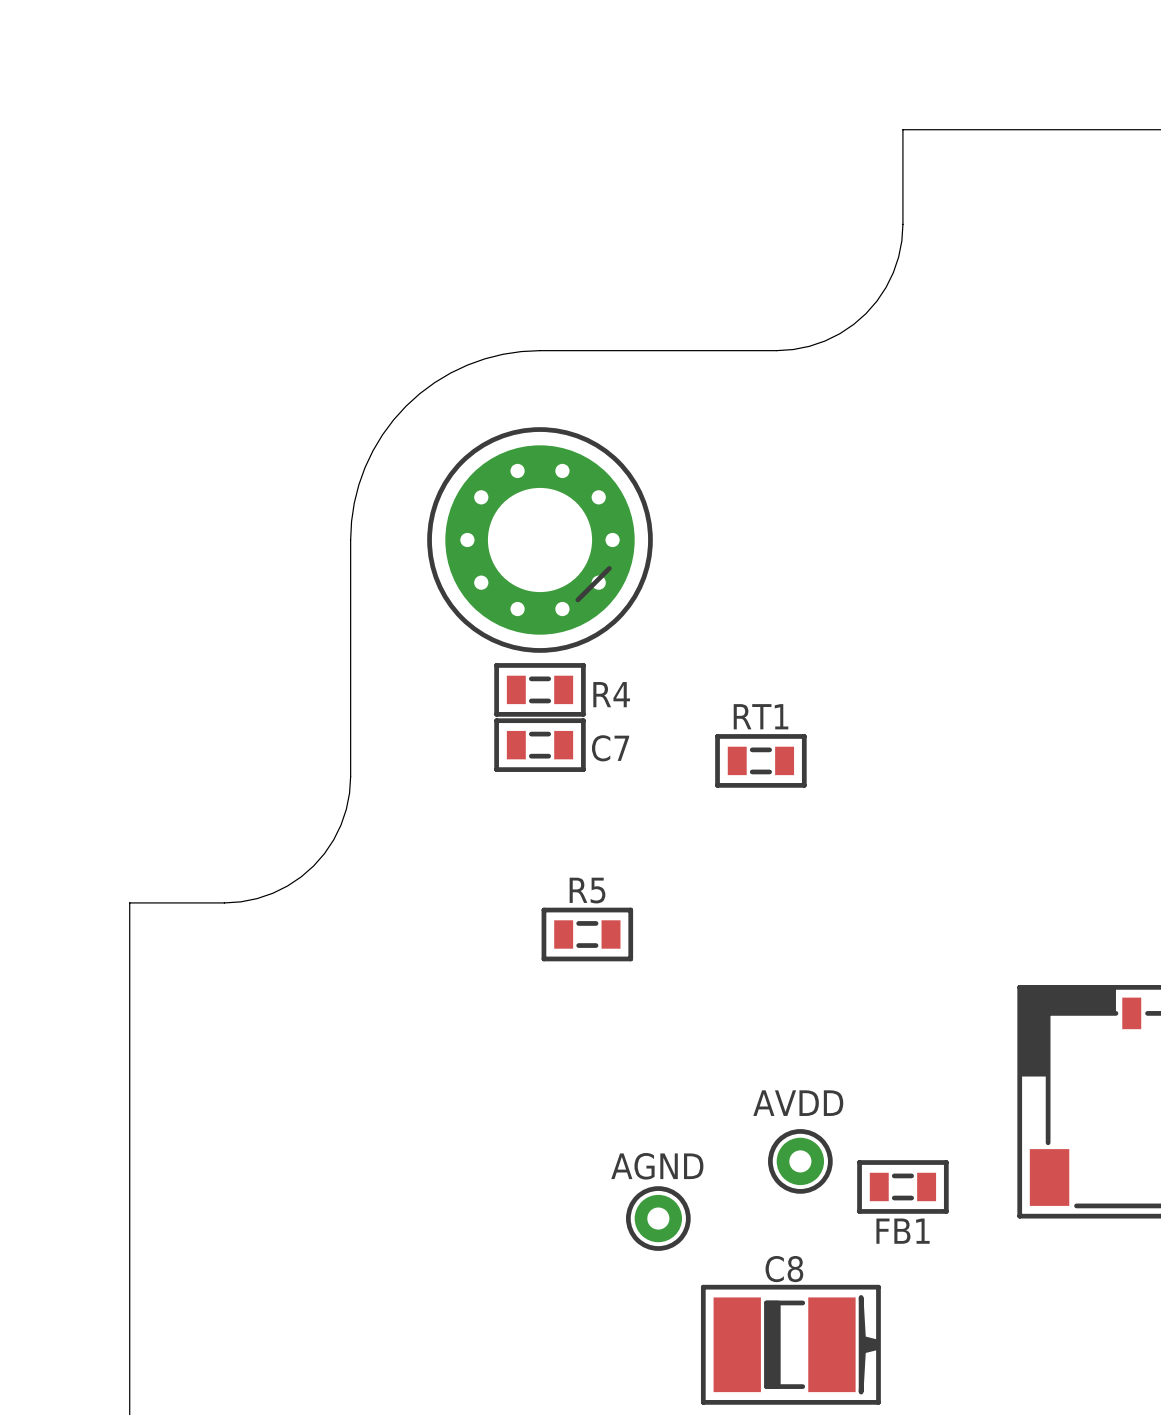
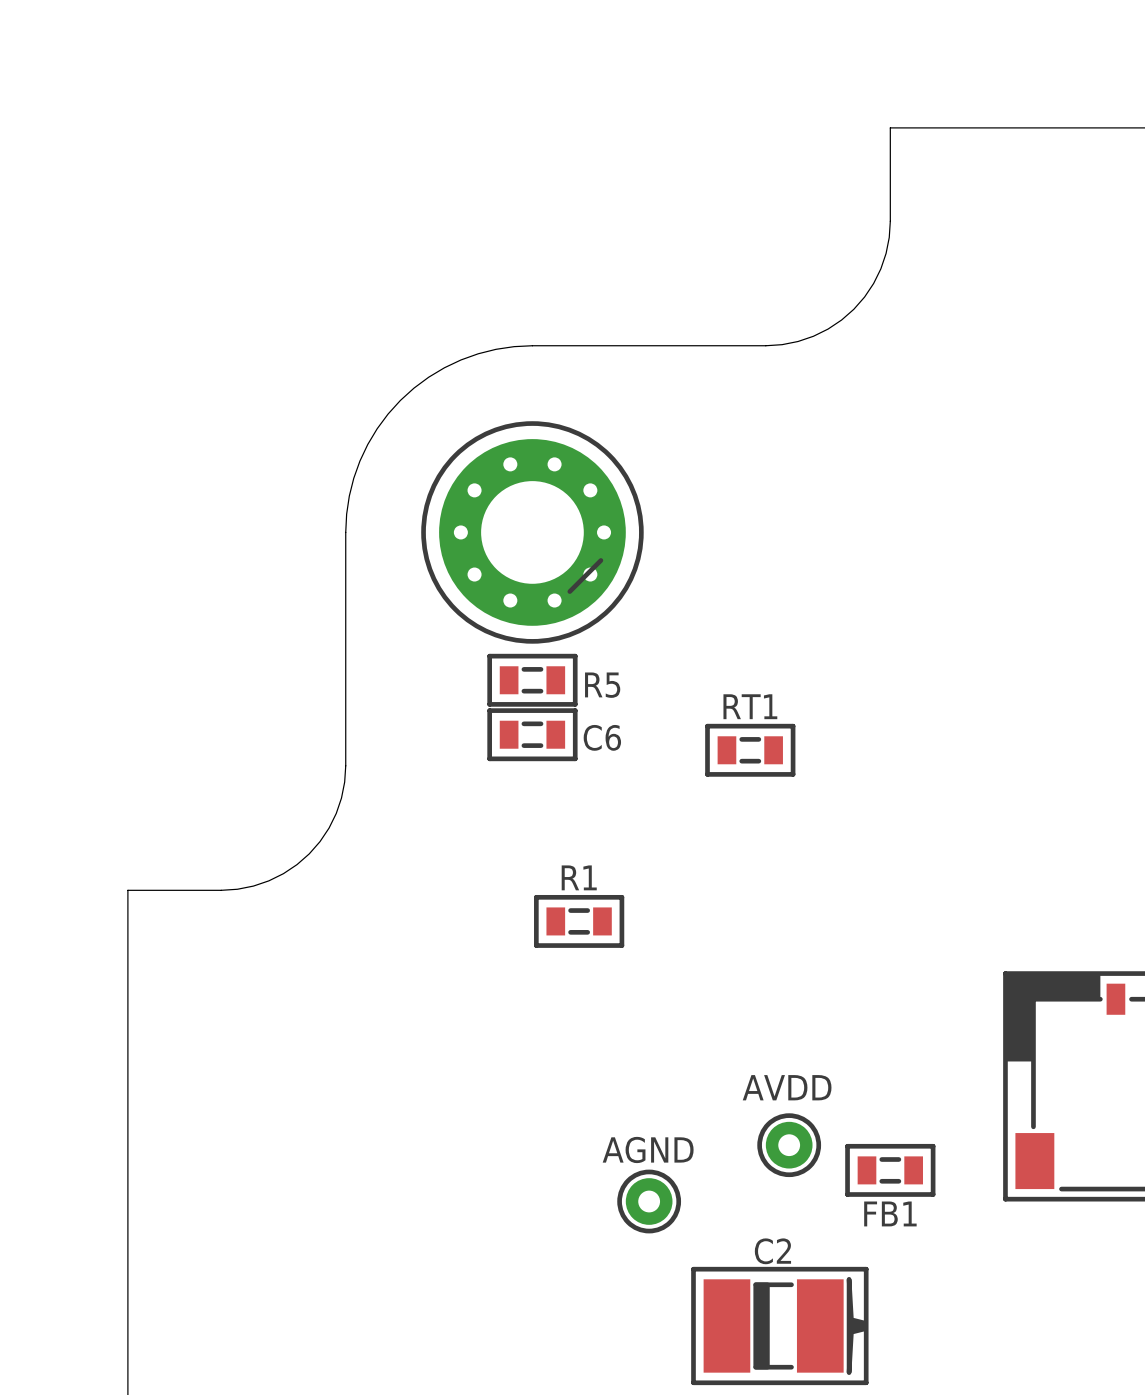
R4 name: R4 (611, 694) -> R5 (602, 685)
C7 name: C7 (610, 748) -> C6 (602, 737)
R5 name: R5 (587, 890) -> R1 (579, 877)
C8 name: C8 (784, 1269) -> C2 (772, 1251)

